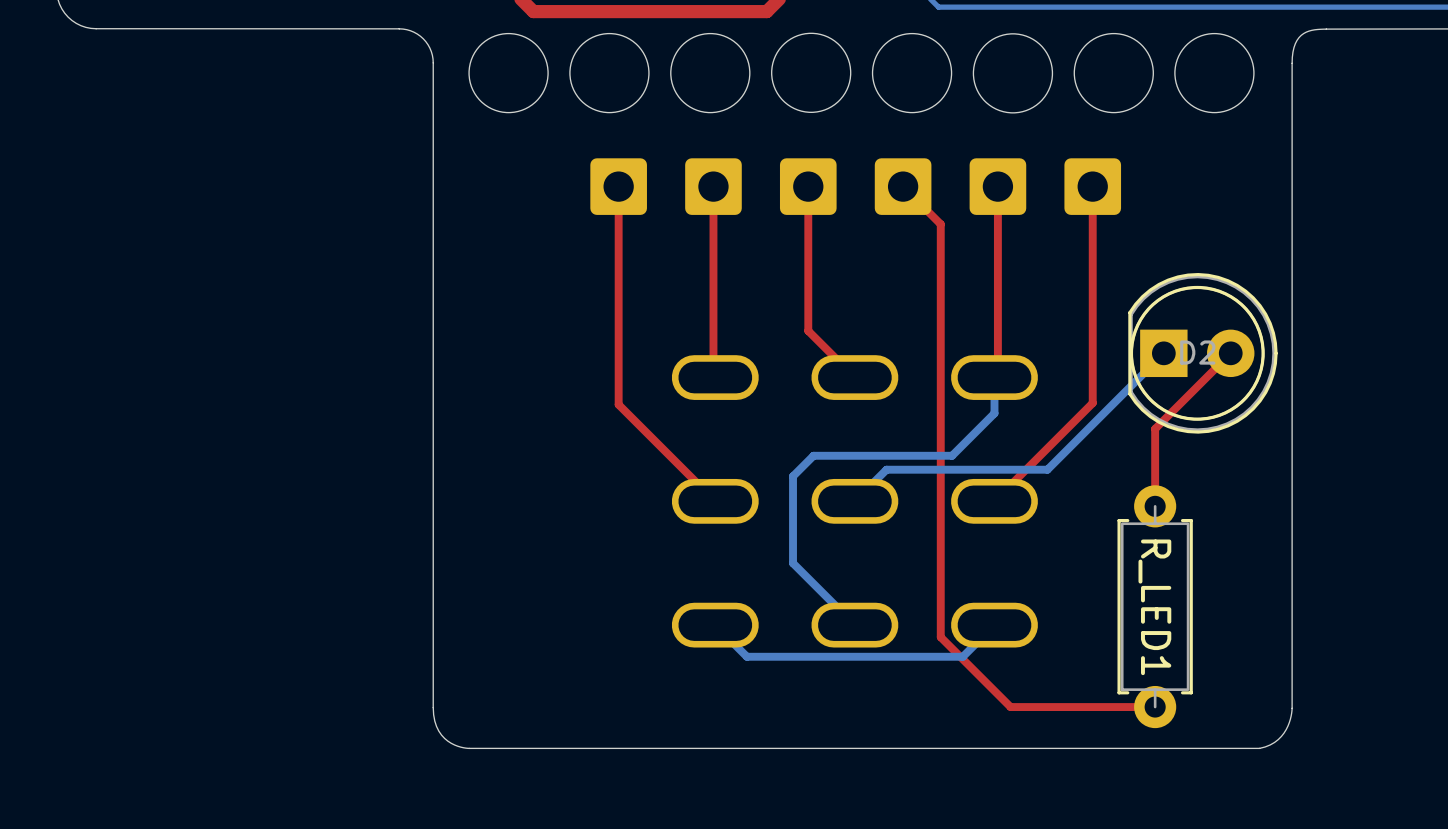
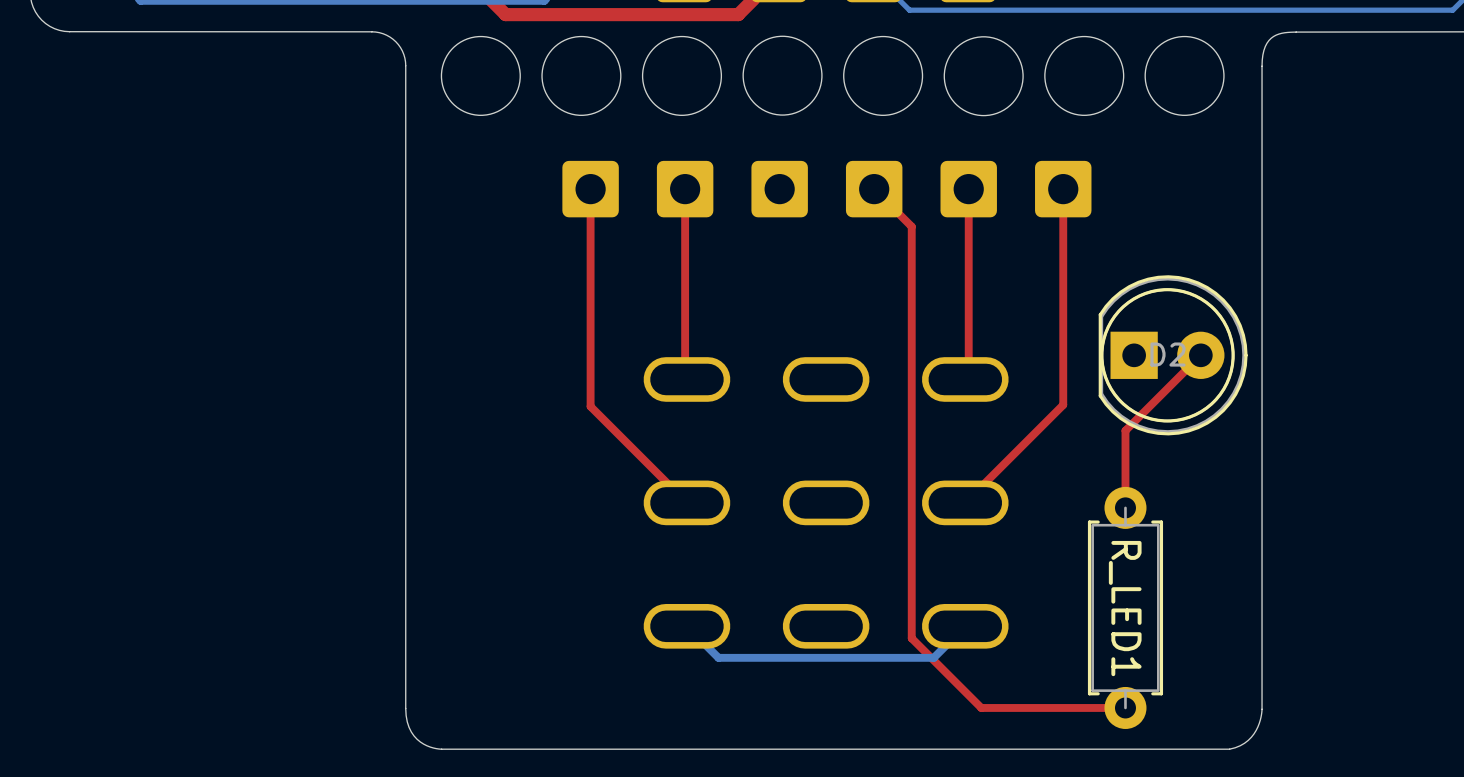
top track: (808, 186) (808, 330) (854, 377) -> none
bottom track: (1163, 353) (1047, 469) (886, 469) (854, 501) -> none
bottom track: (994, 377) (994, 413) (952, 455) (813, 455) (793, 476) (793, 563) (854, 625) -> none

